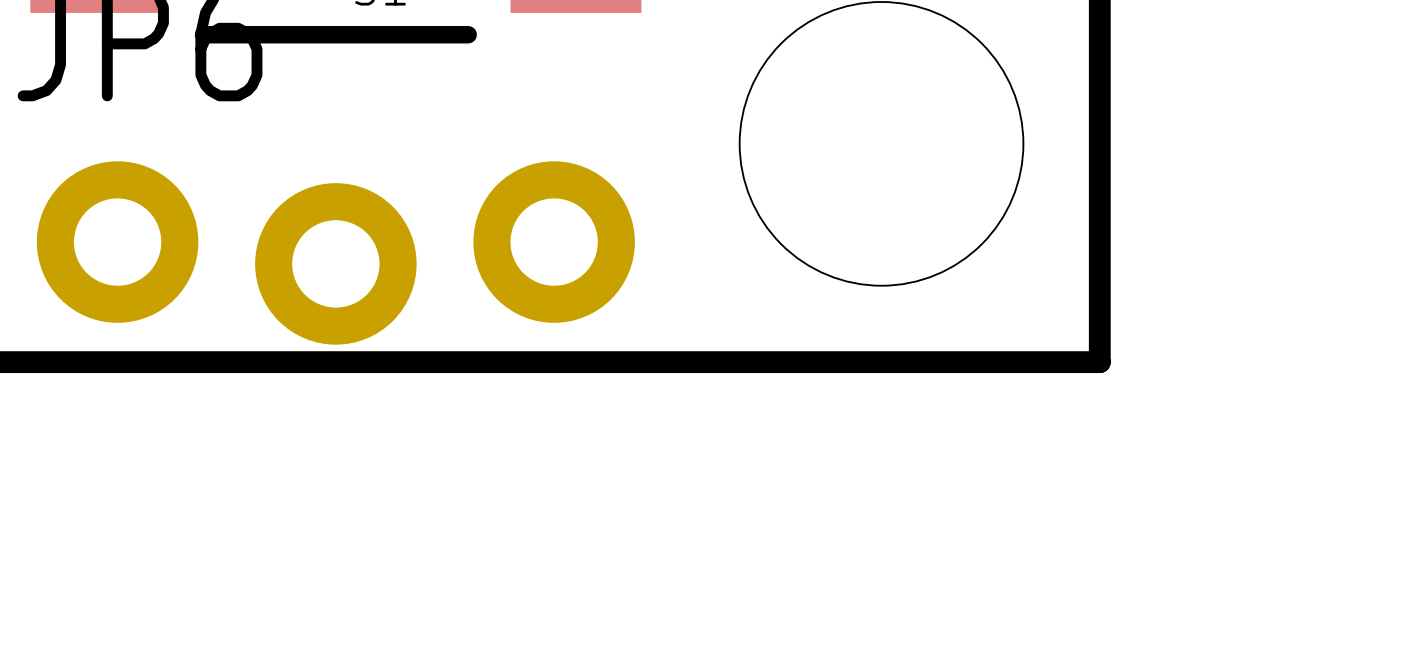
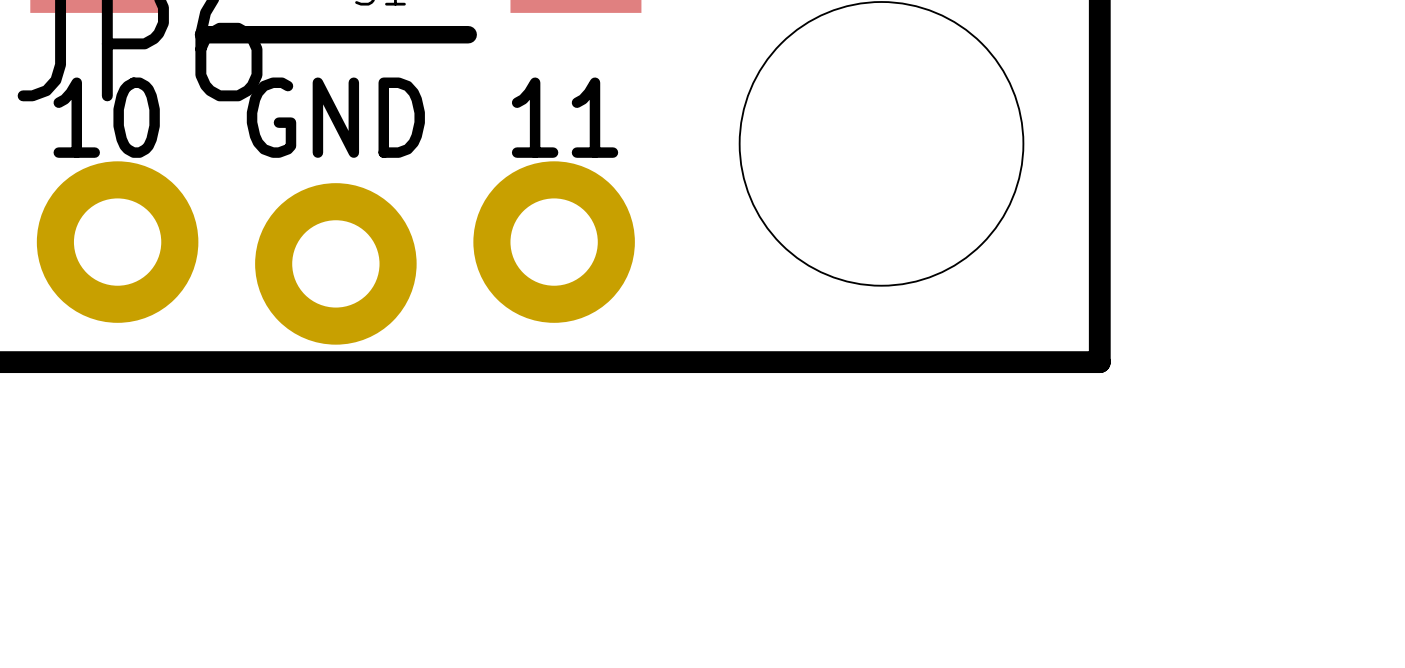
text: none -> 10 (106, 117)
text: none -> GND (335, 117)
text: none -> 11 (565, 117)

